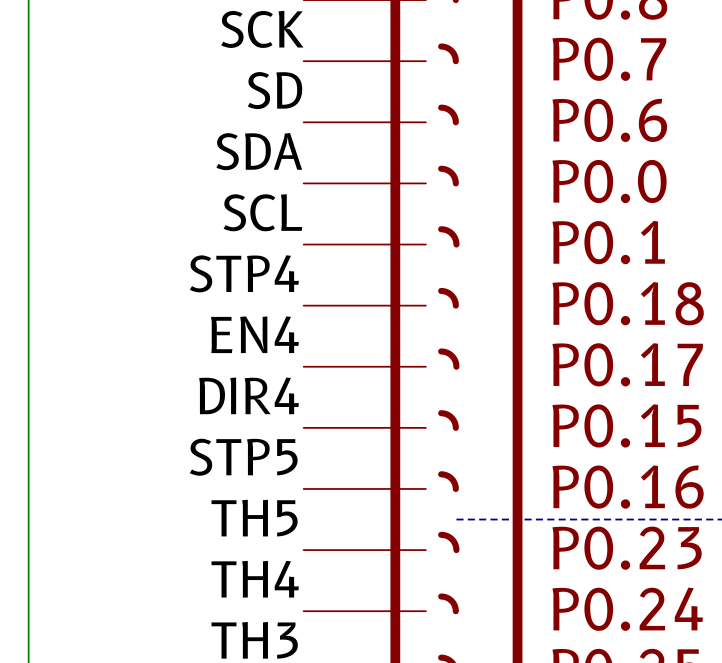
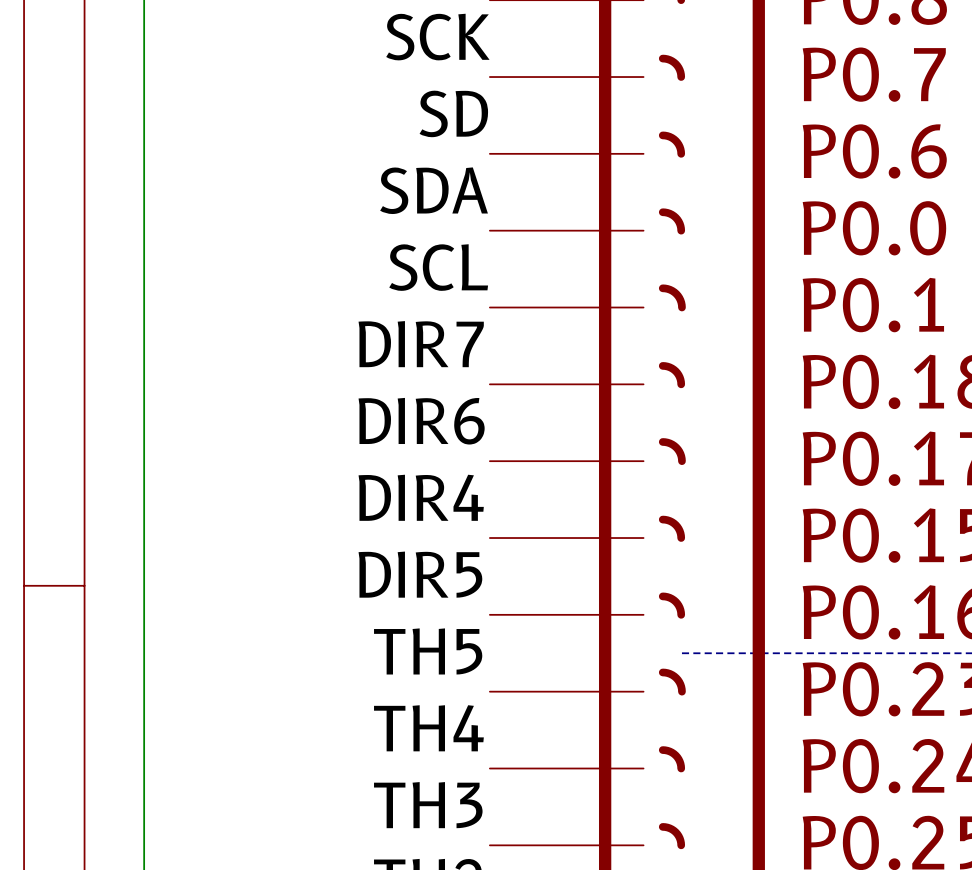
label: STP4 (244, 273) -> DIR7 (421, 344)
label: EN4 (254, 334) -> DIR6 (421, 421)
label: STP5 (243, 457) -> DIR5 (420, 574)

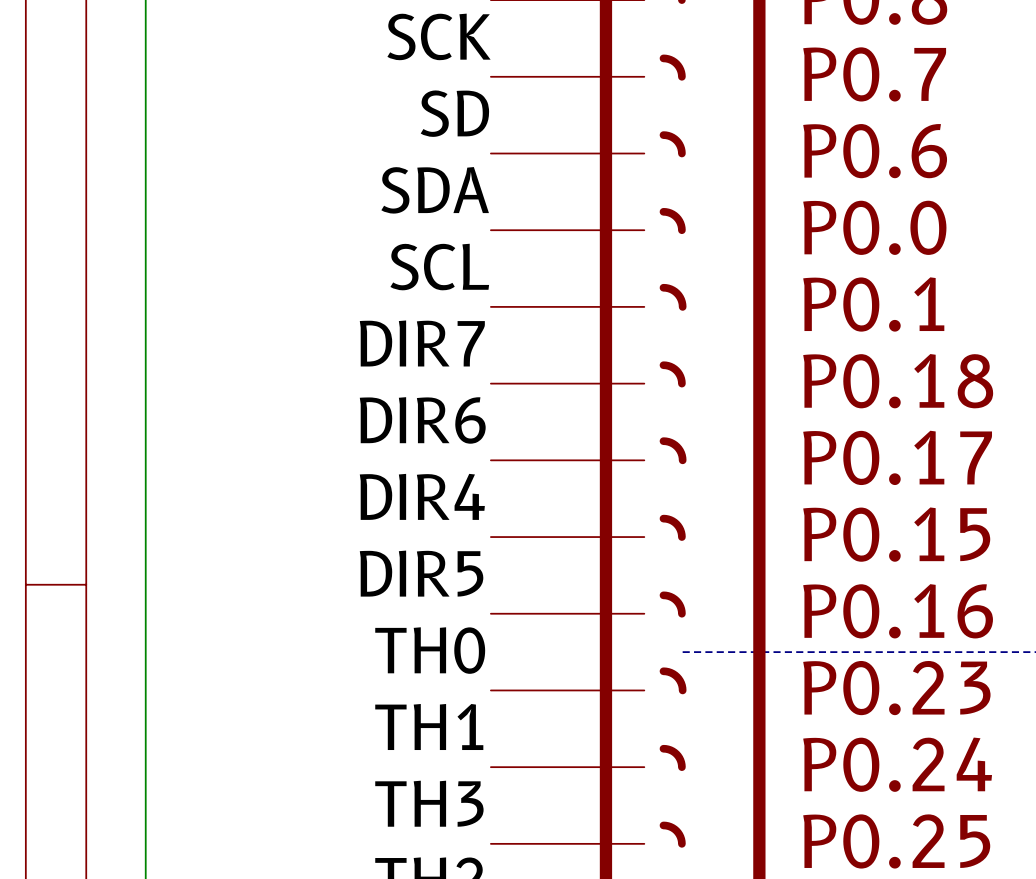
label: TH5 (428, 651) -> TH0 (430, 650)
label: TH4 (428, 728) -> TH1 (429, 727)

